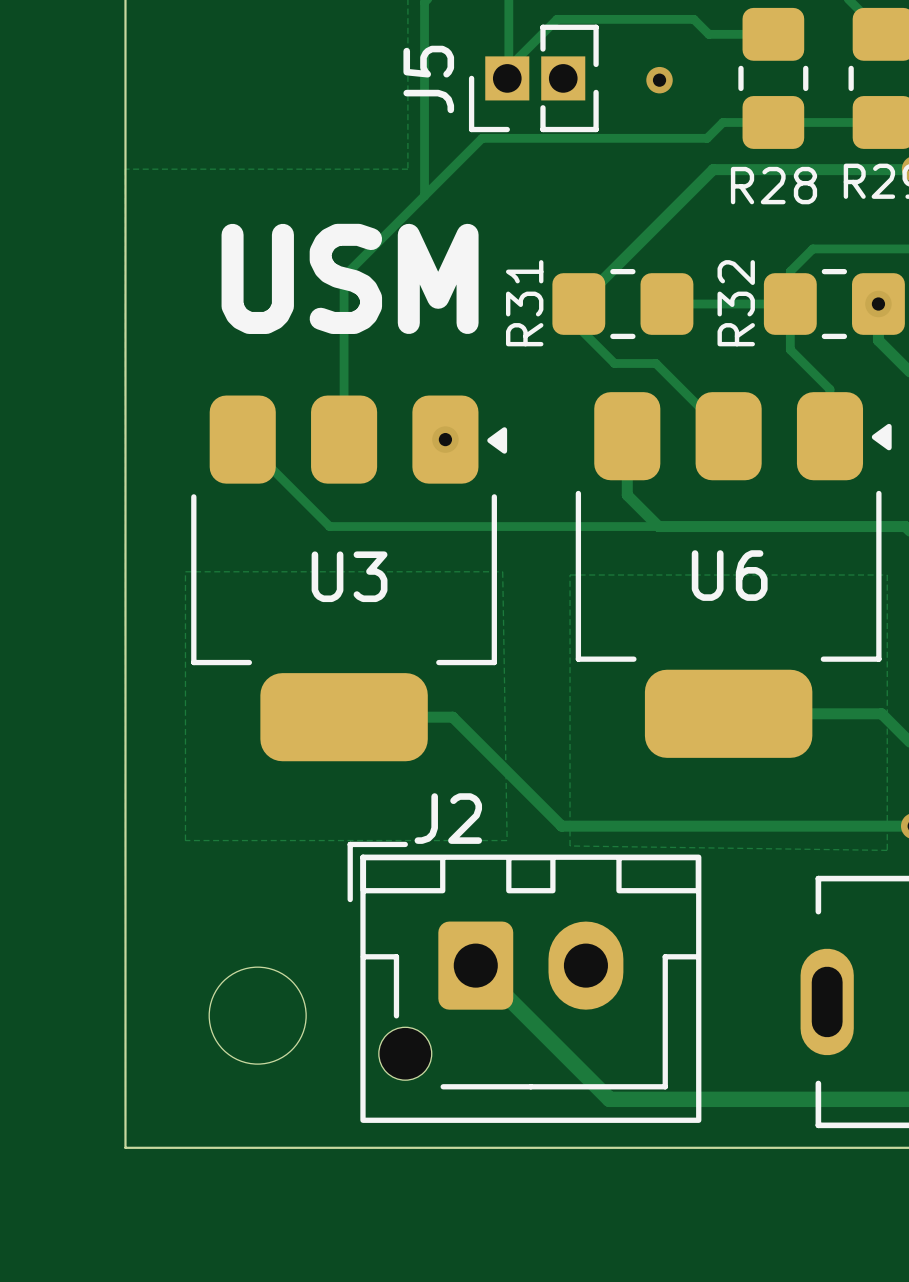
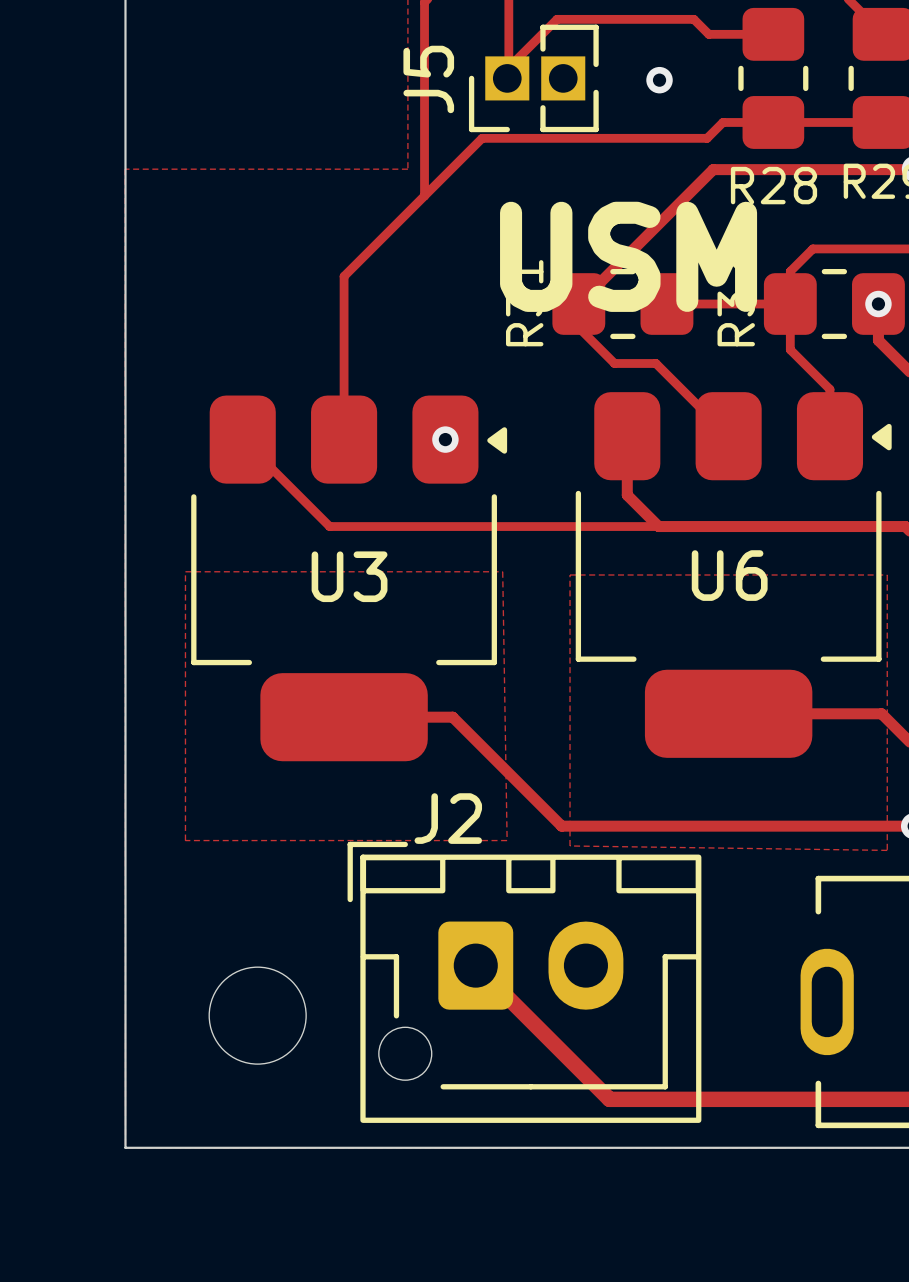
text position: USM (350, 278) -> USM (628, 256)

